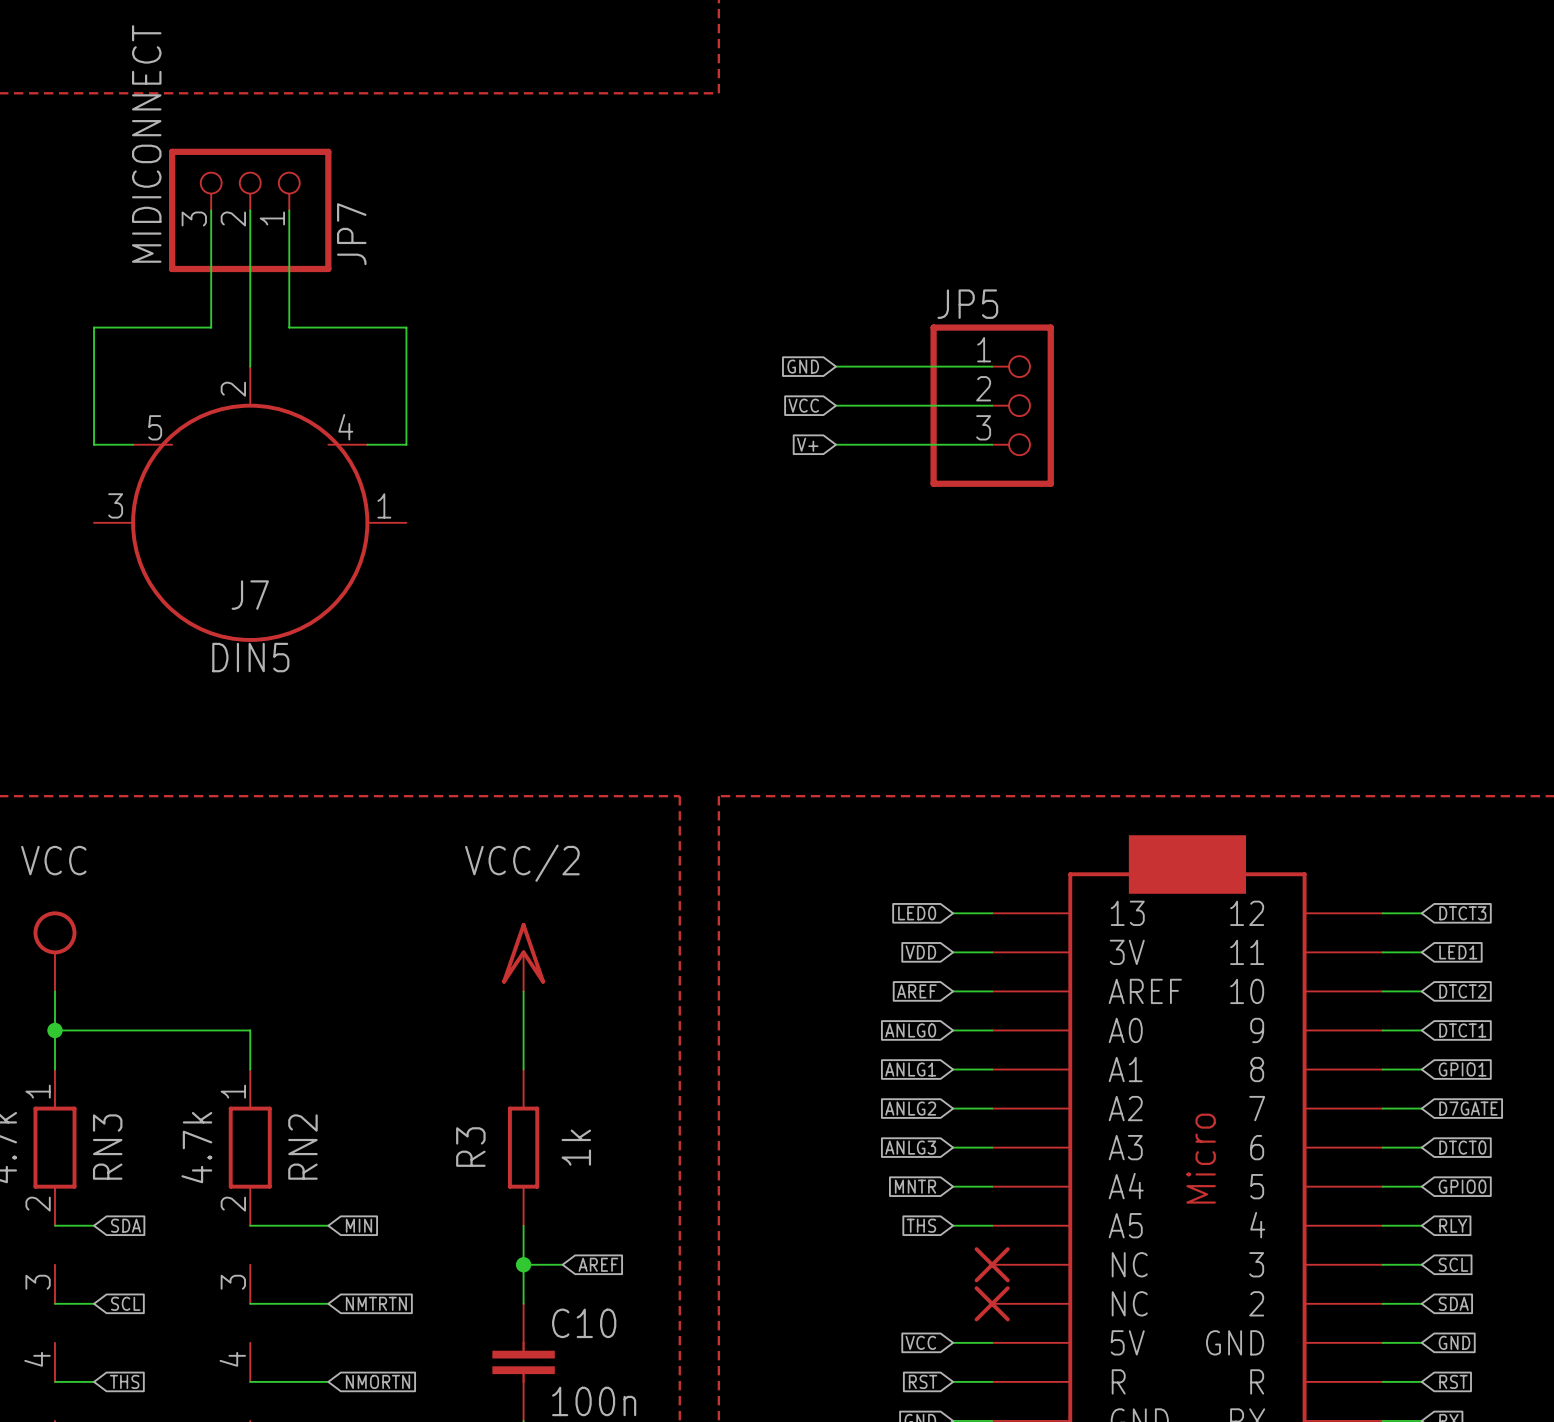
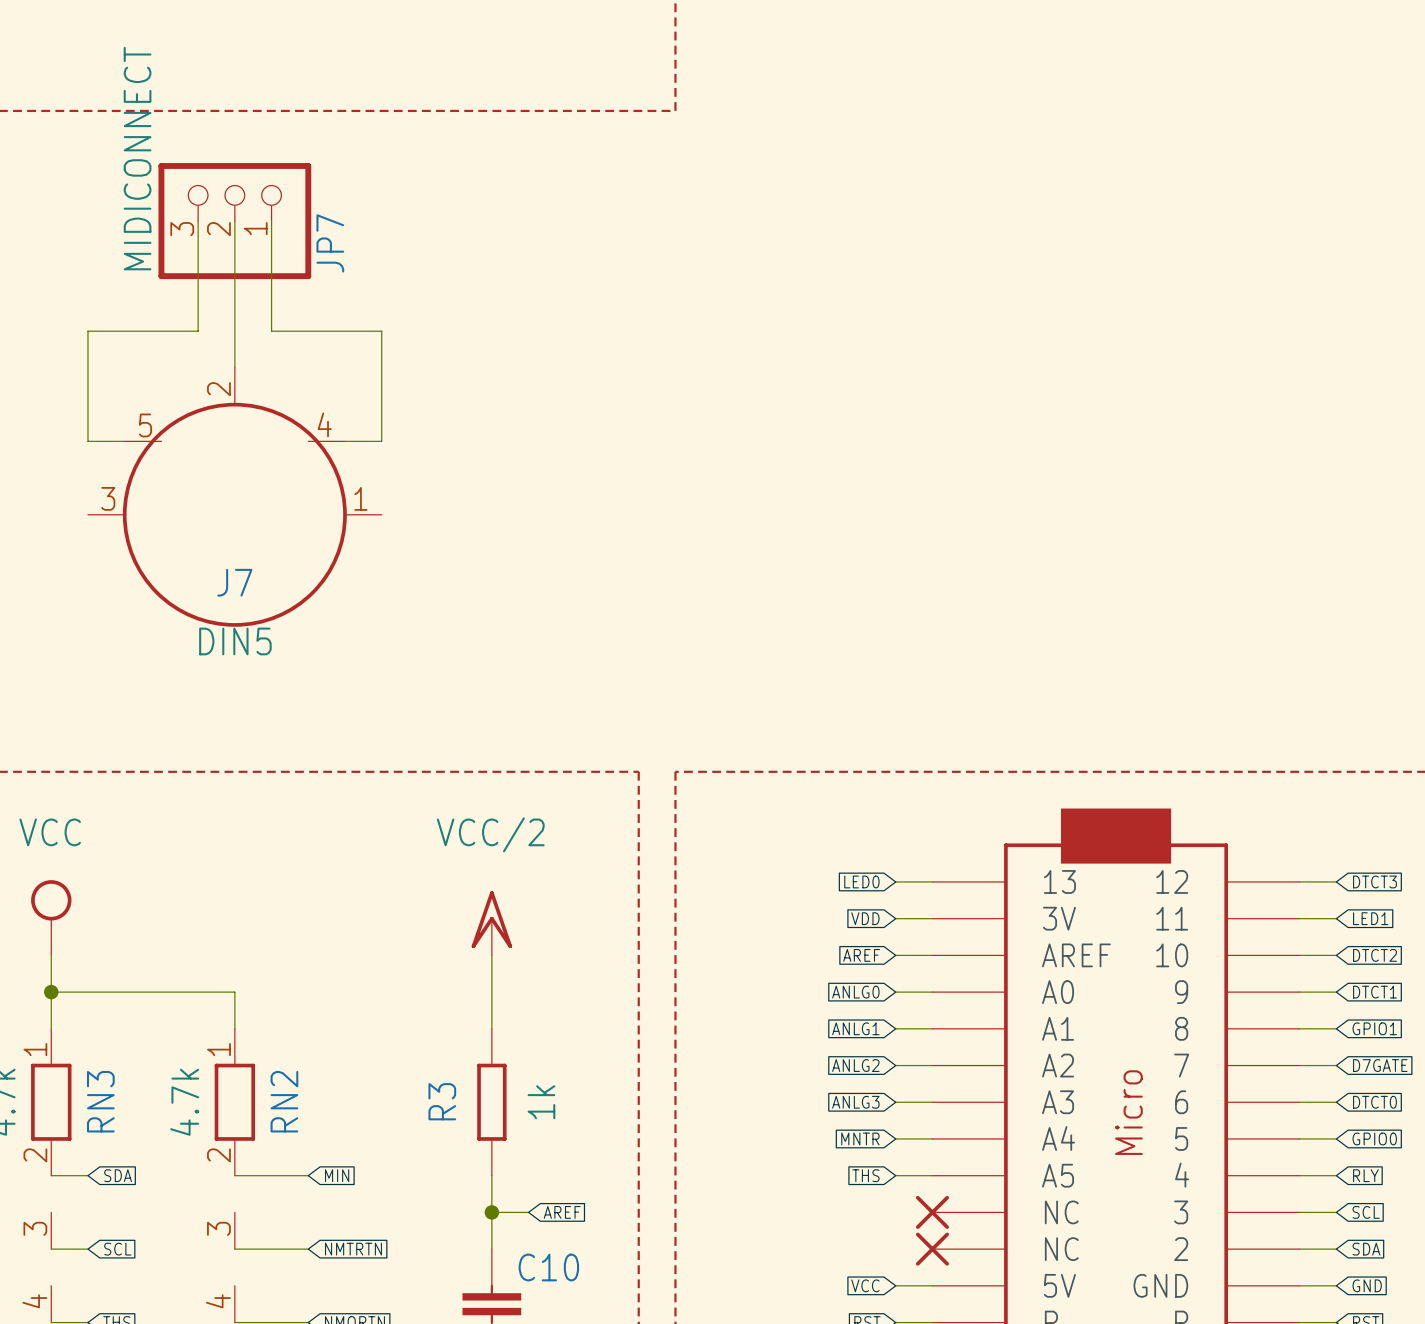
global label: GND (803, 366) -> none
wire: (835, 366) (992, 366) -> none
global label: VCC (803, 405) -> none
wire: (835, 405) (992, 405) -> none
JP5: (992, 405) -> none
global label: V+ (807, 444) -> none
wire: (835, 444) (992, 444) -> none

